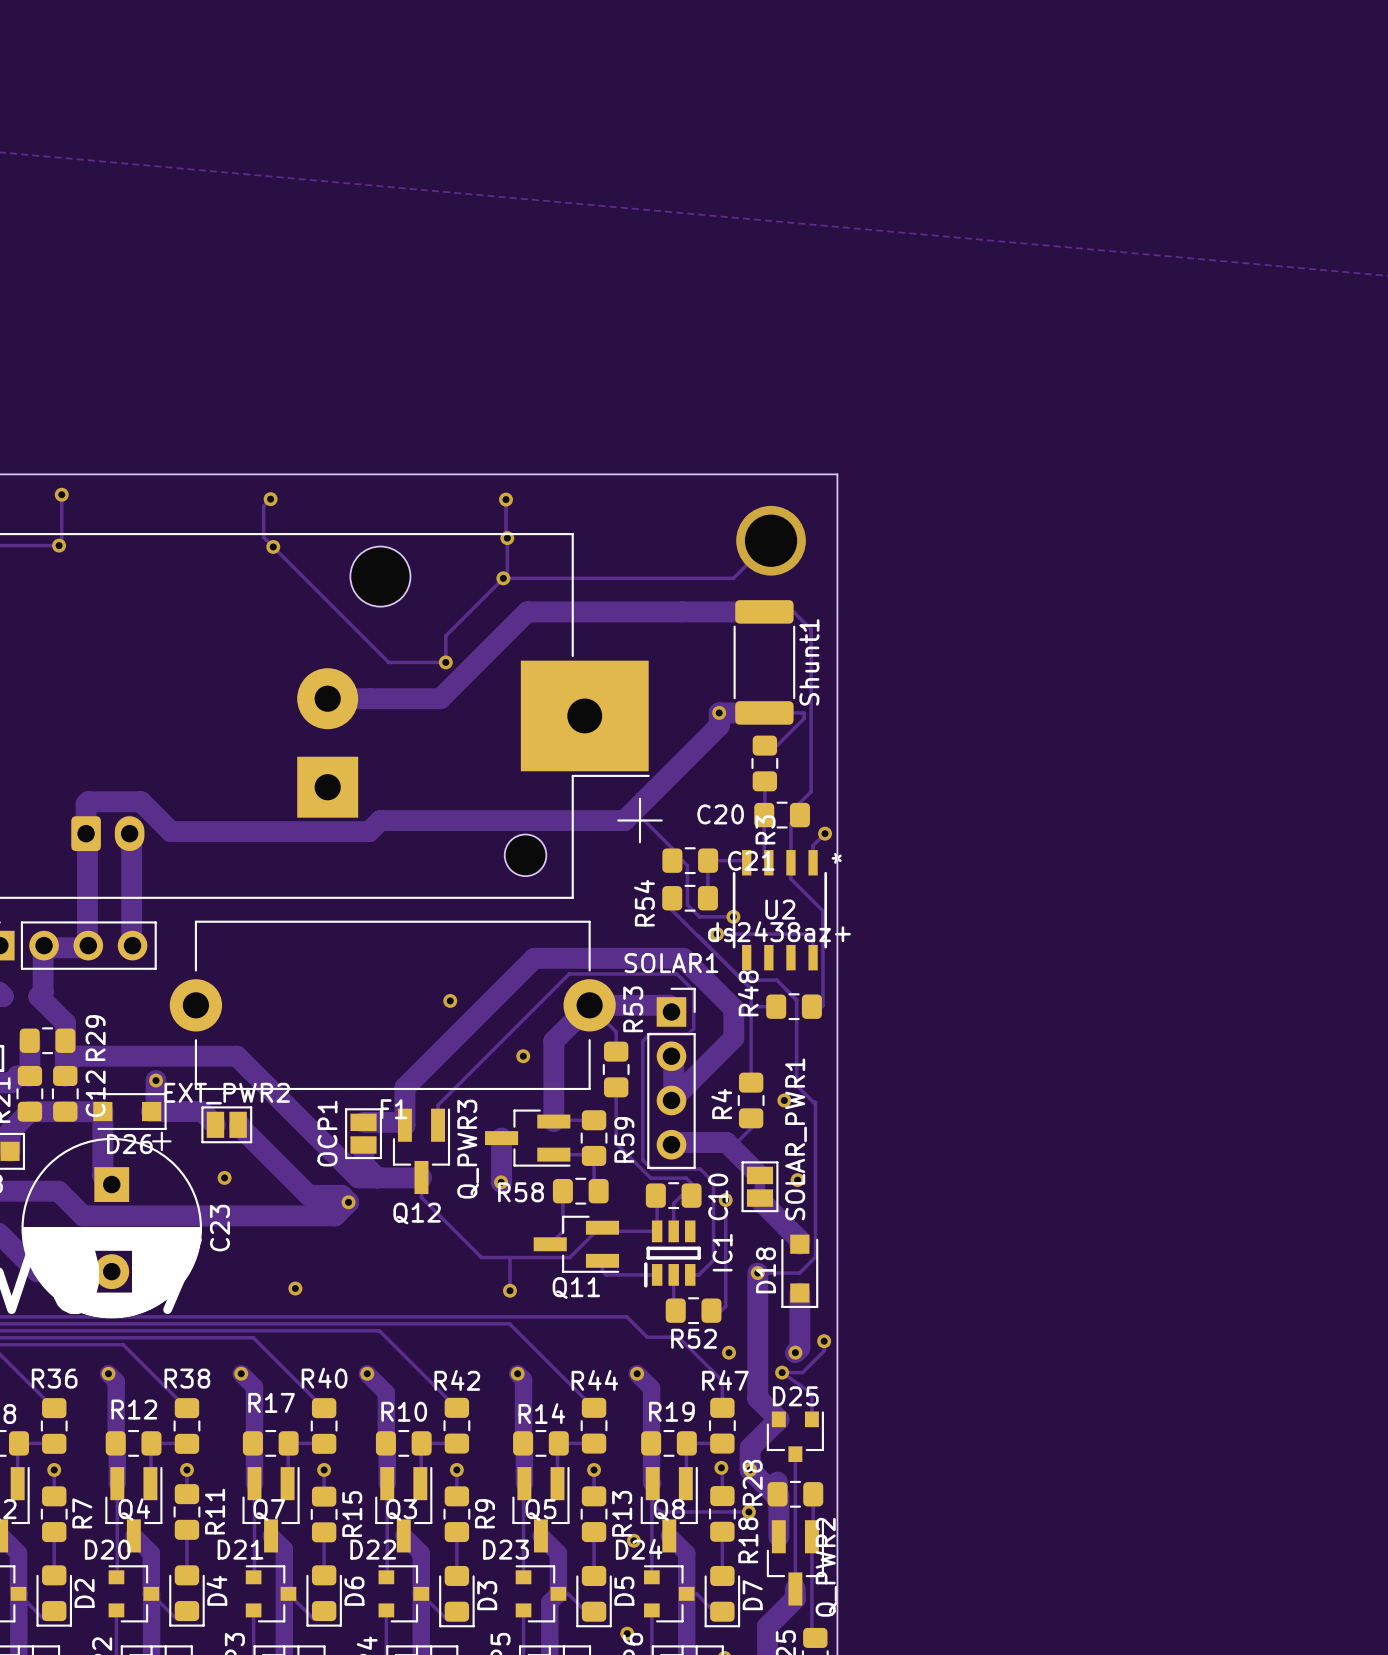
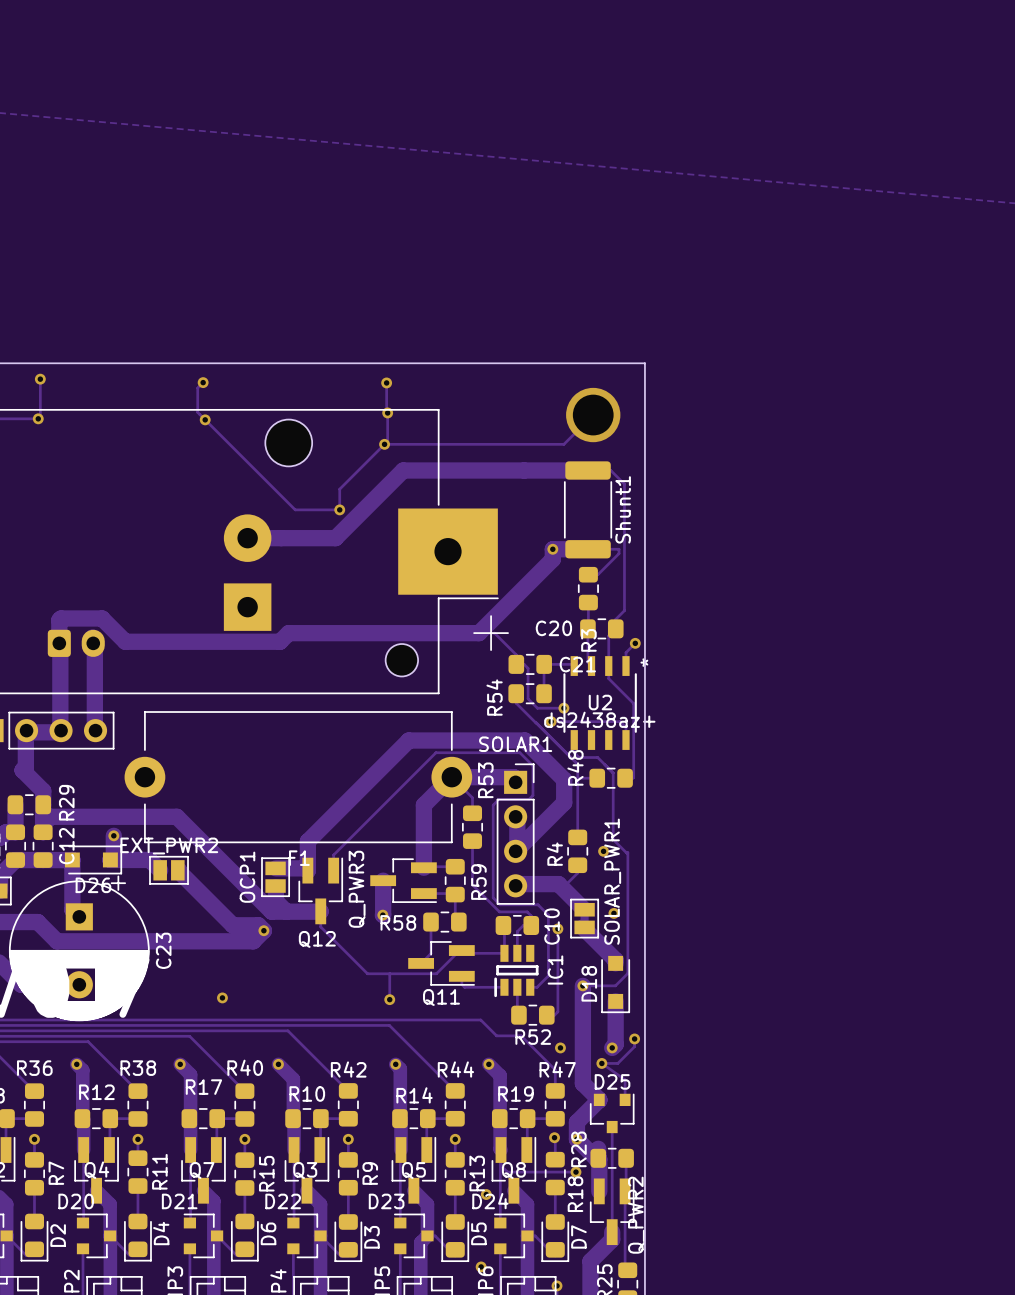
via: (450, 1000) -> none
via: (523, 1056) -> none
via: (224, 1177) -> none

